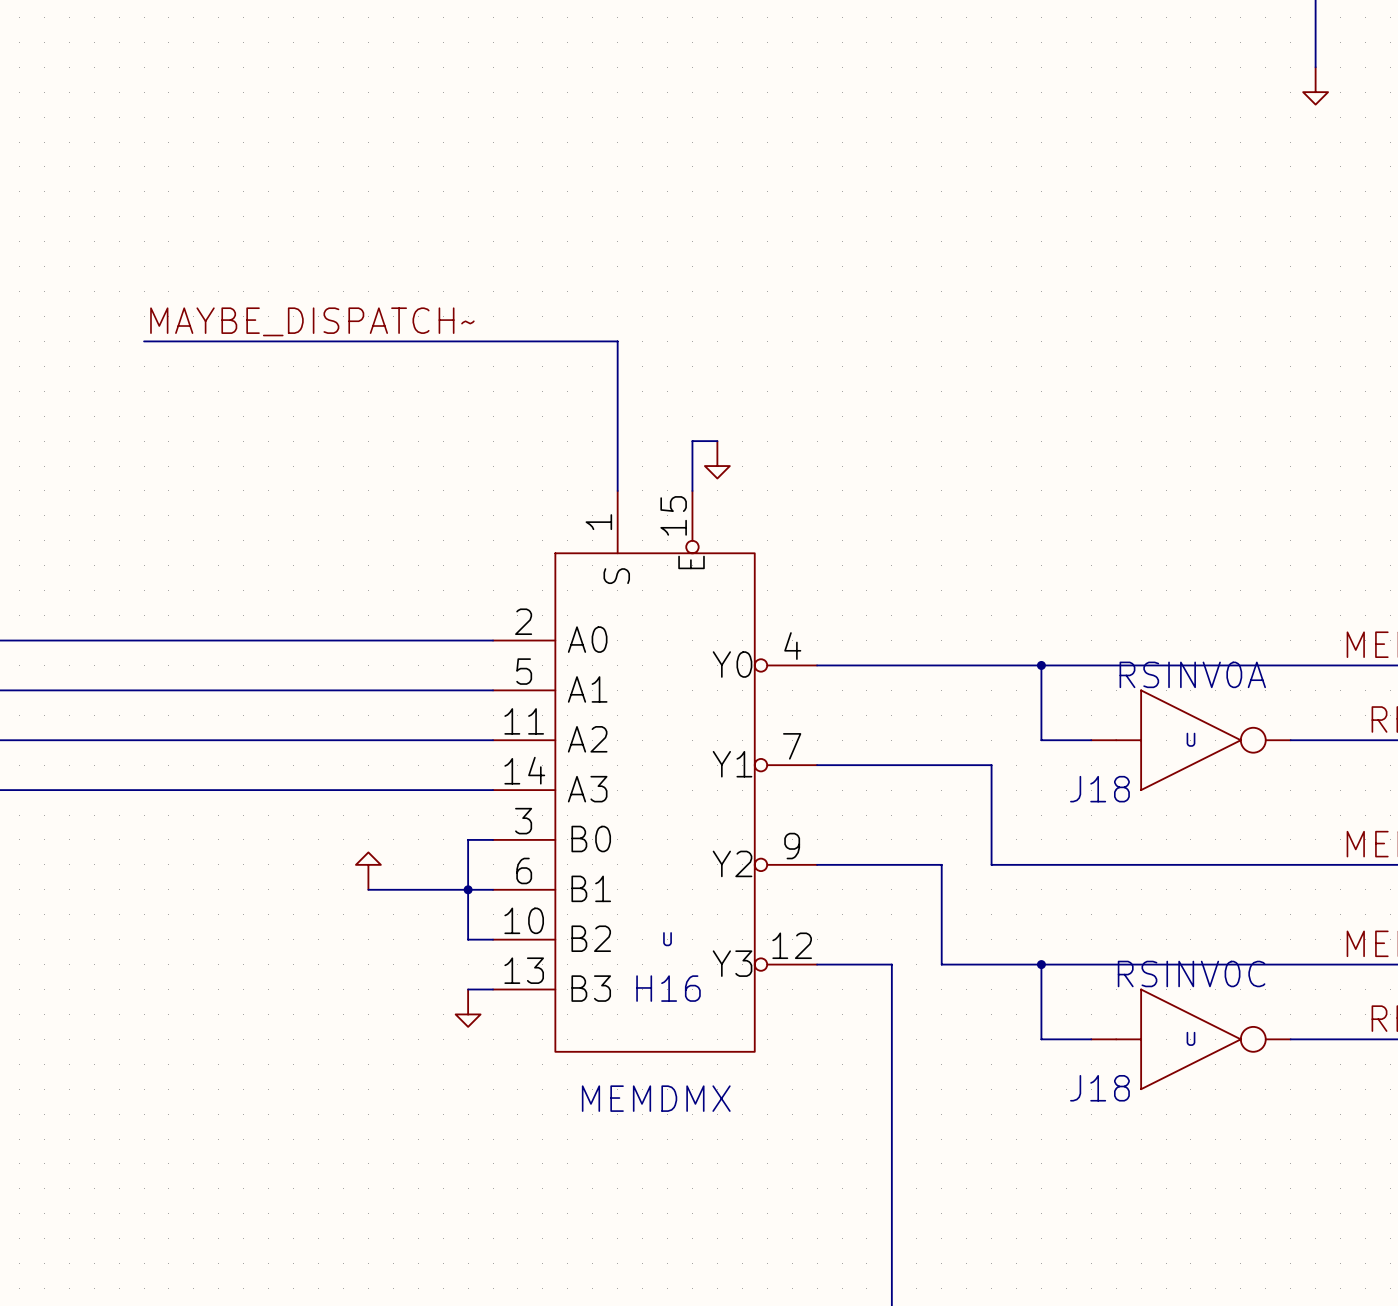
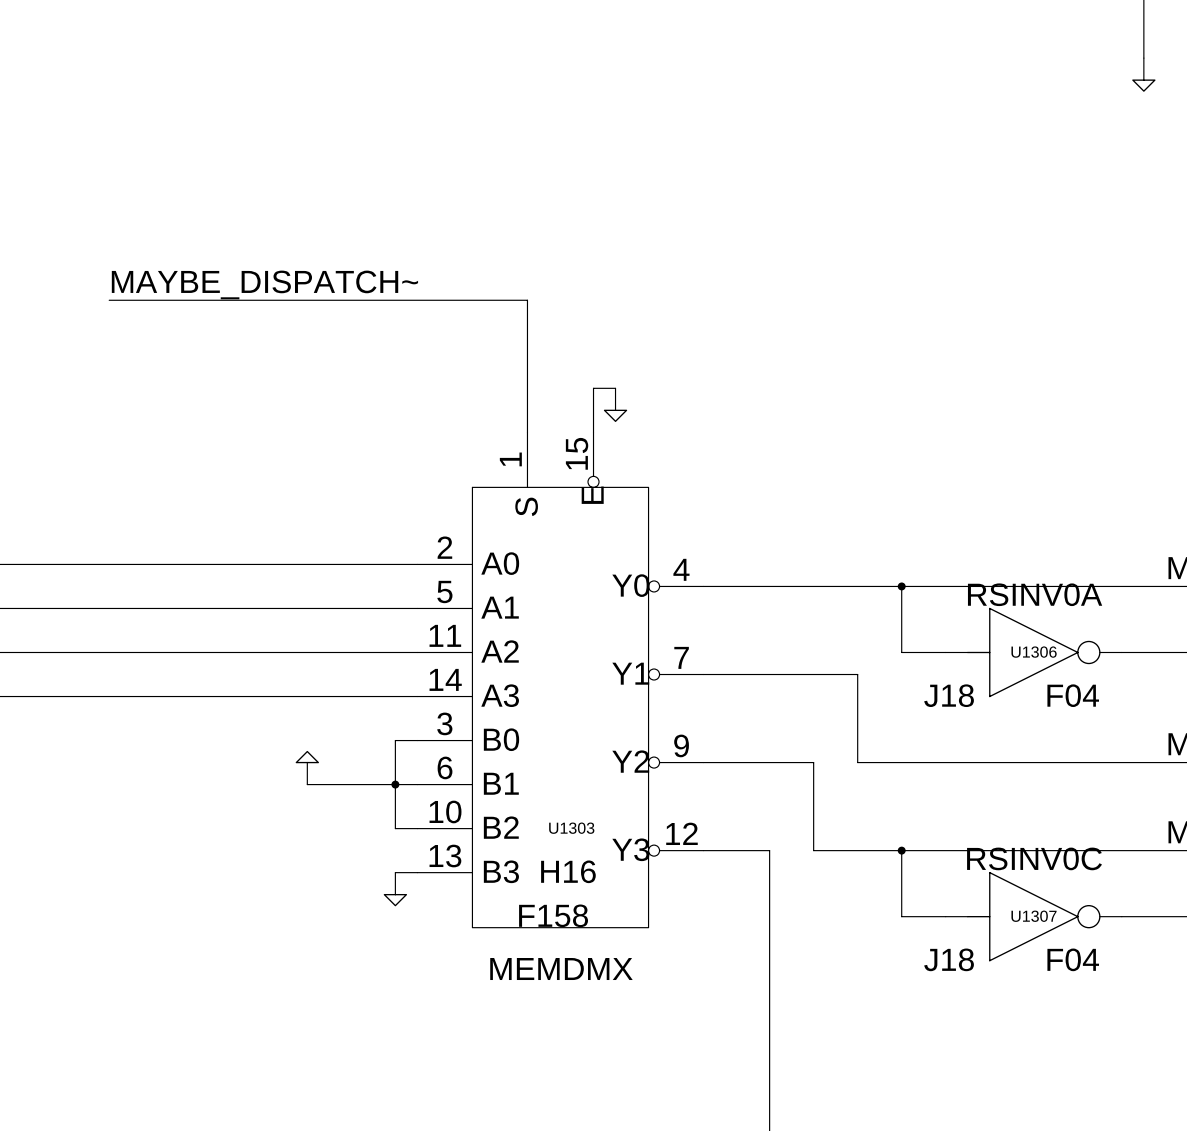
U name: U (1190, 739) -> U1306 (1034, 652)
U value: none -> F04 (1073, 695)
U name: U (667, 939) -> U1303 (571, 828)
U value: none -> F158 (553, 915)
U name: U (1190, 1038) -> U1307 (1034, 916)
U value: none -> F04 (1073, 959)

